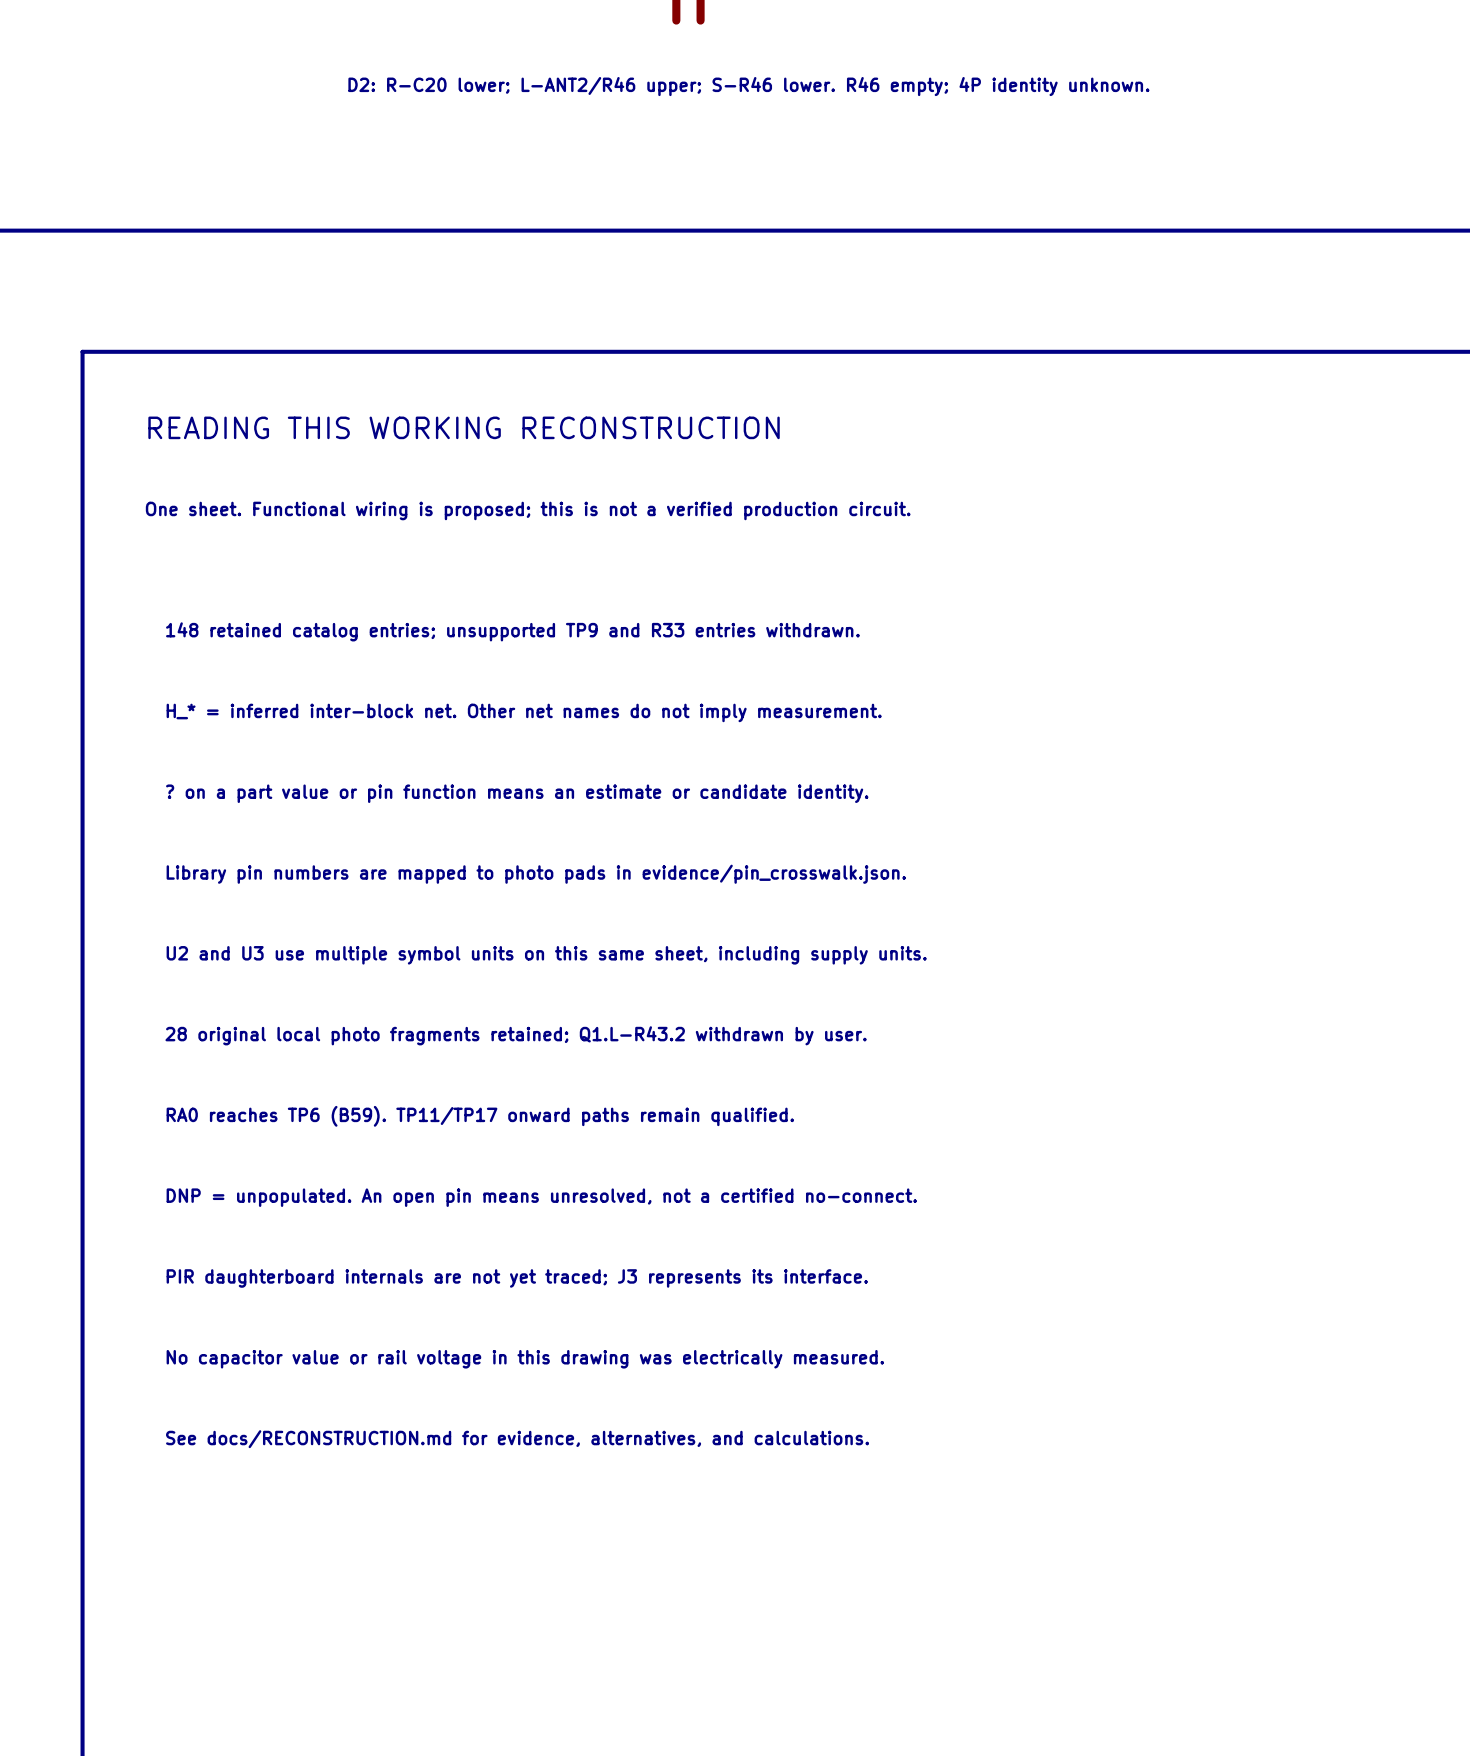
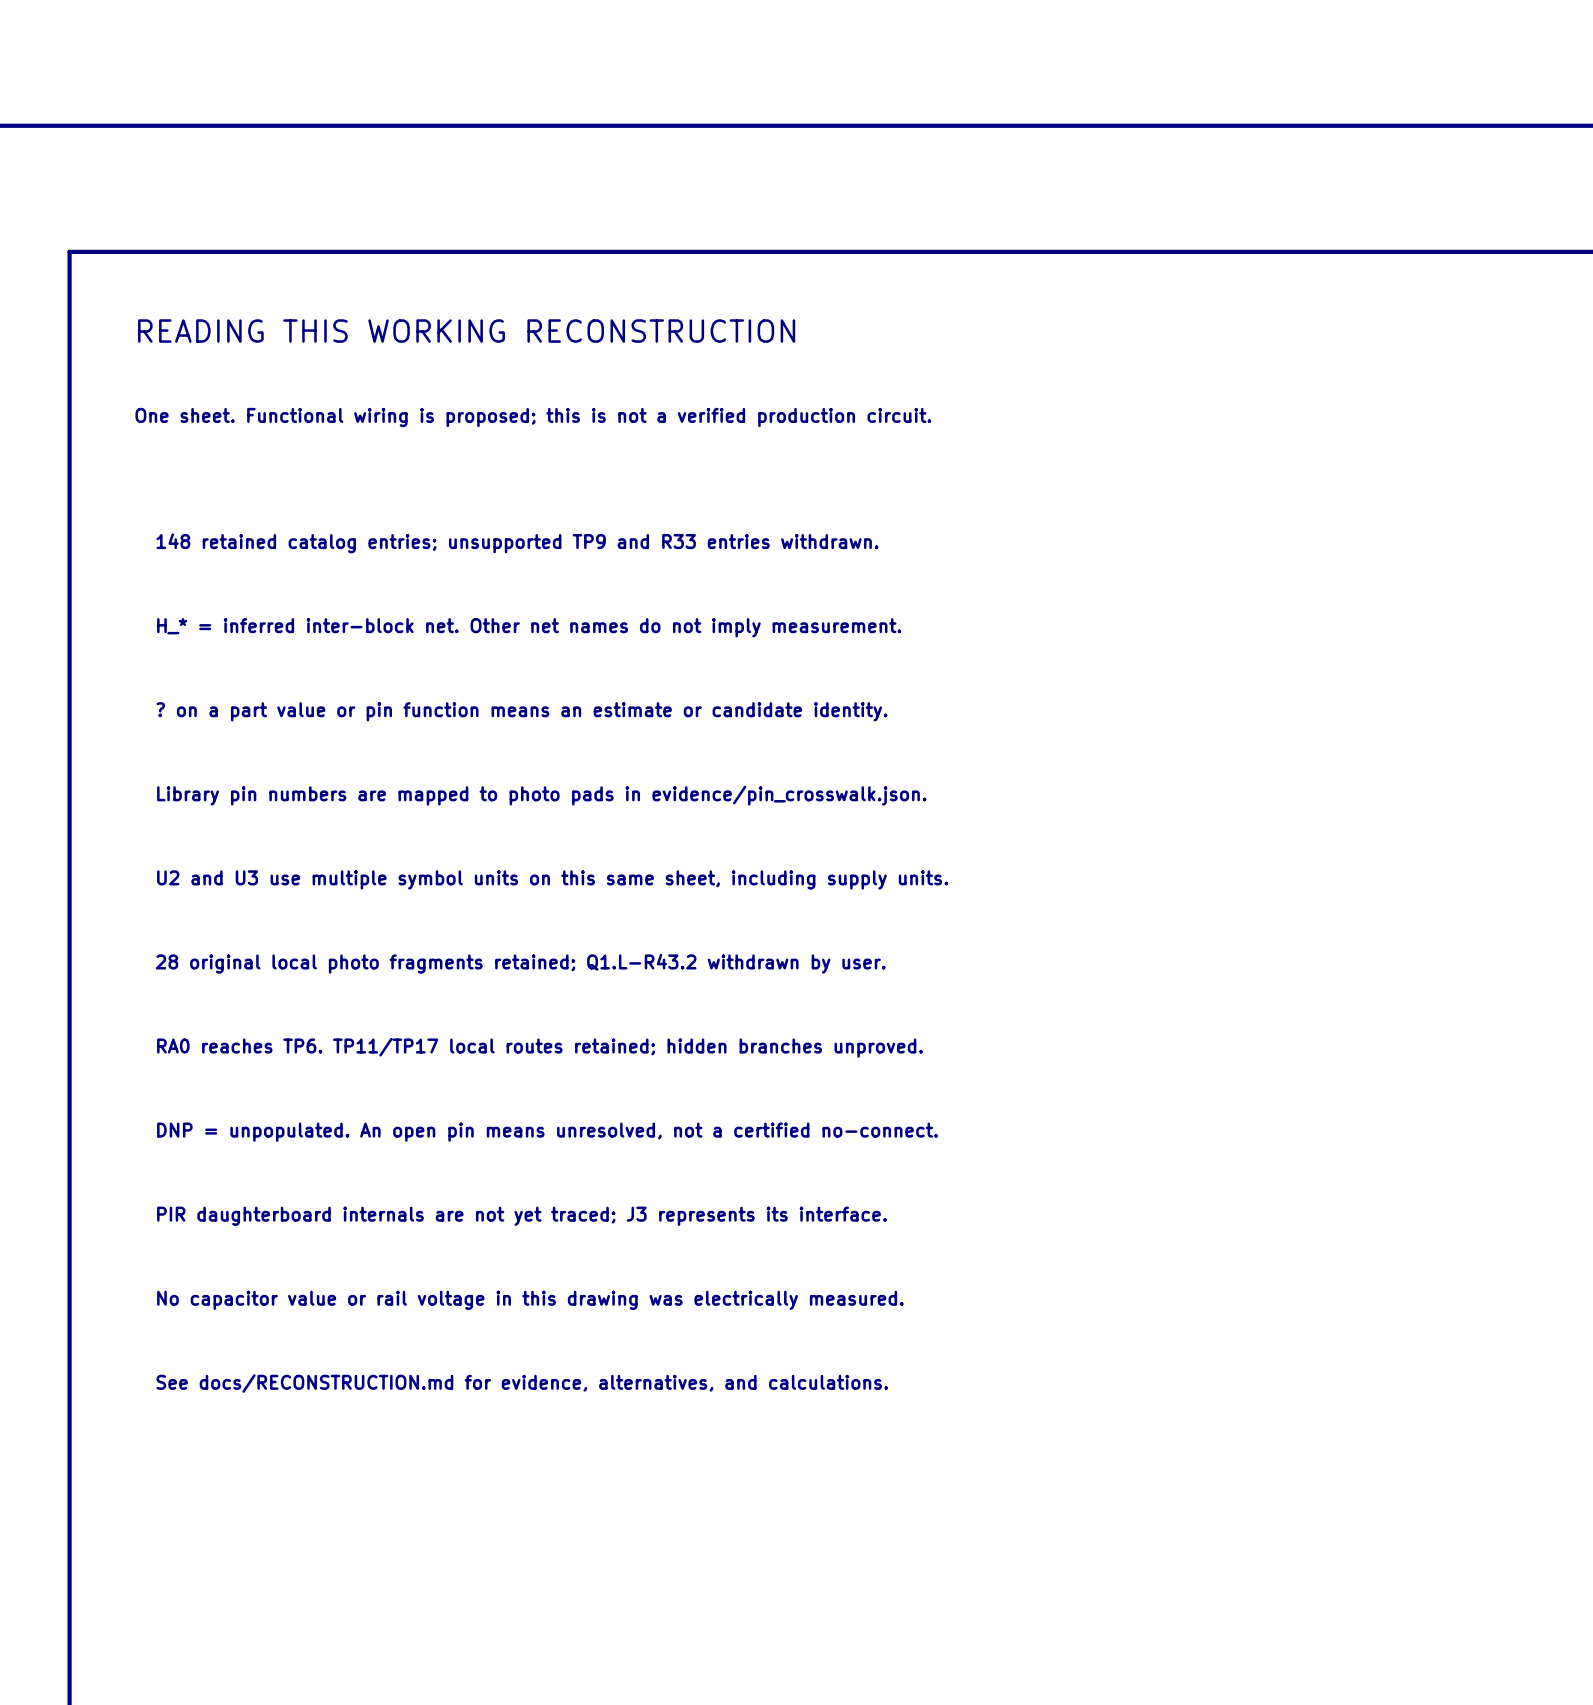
text: RA0 reaches TP6 (B59). TP11/TP17 onward paths remain qualified. (480, 1116) -> RA0 reaches TP6. TP11/TP17 local routes retained; hidden branches unproved. (539, 1047)

